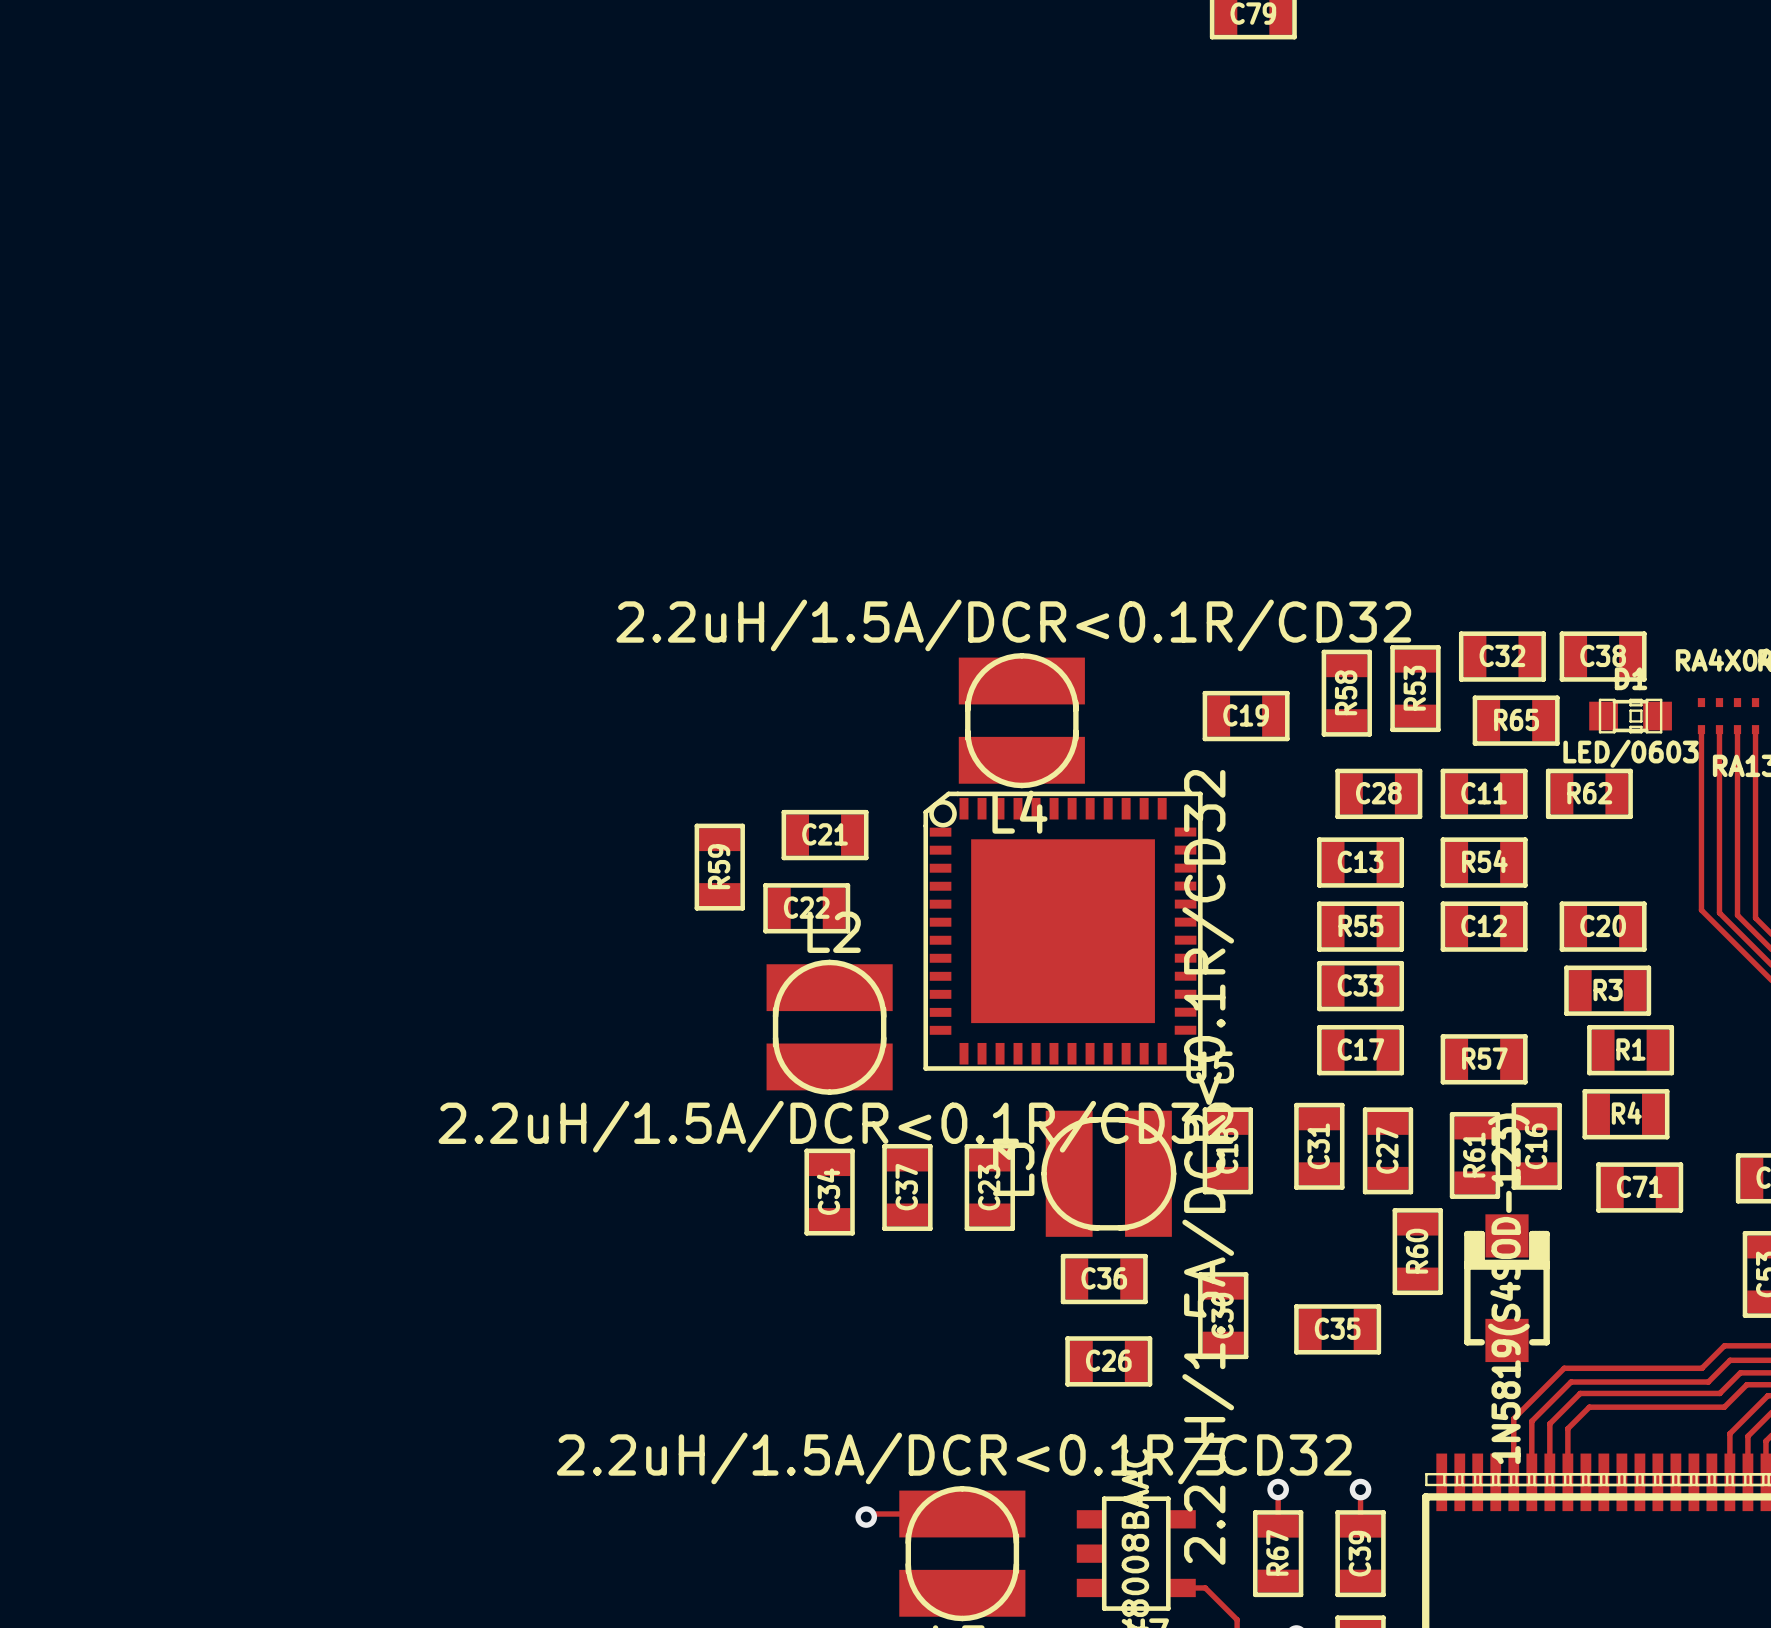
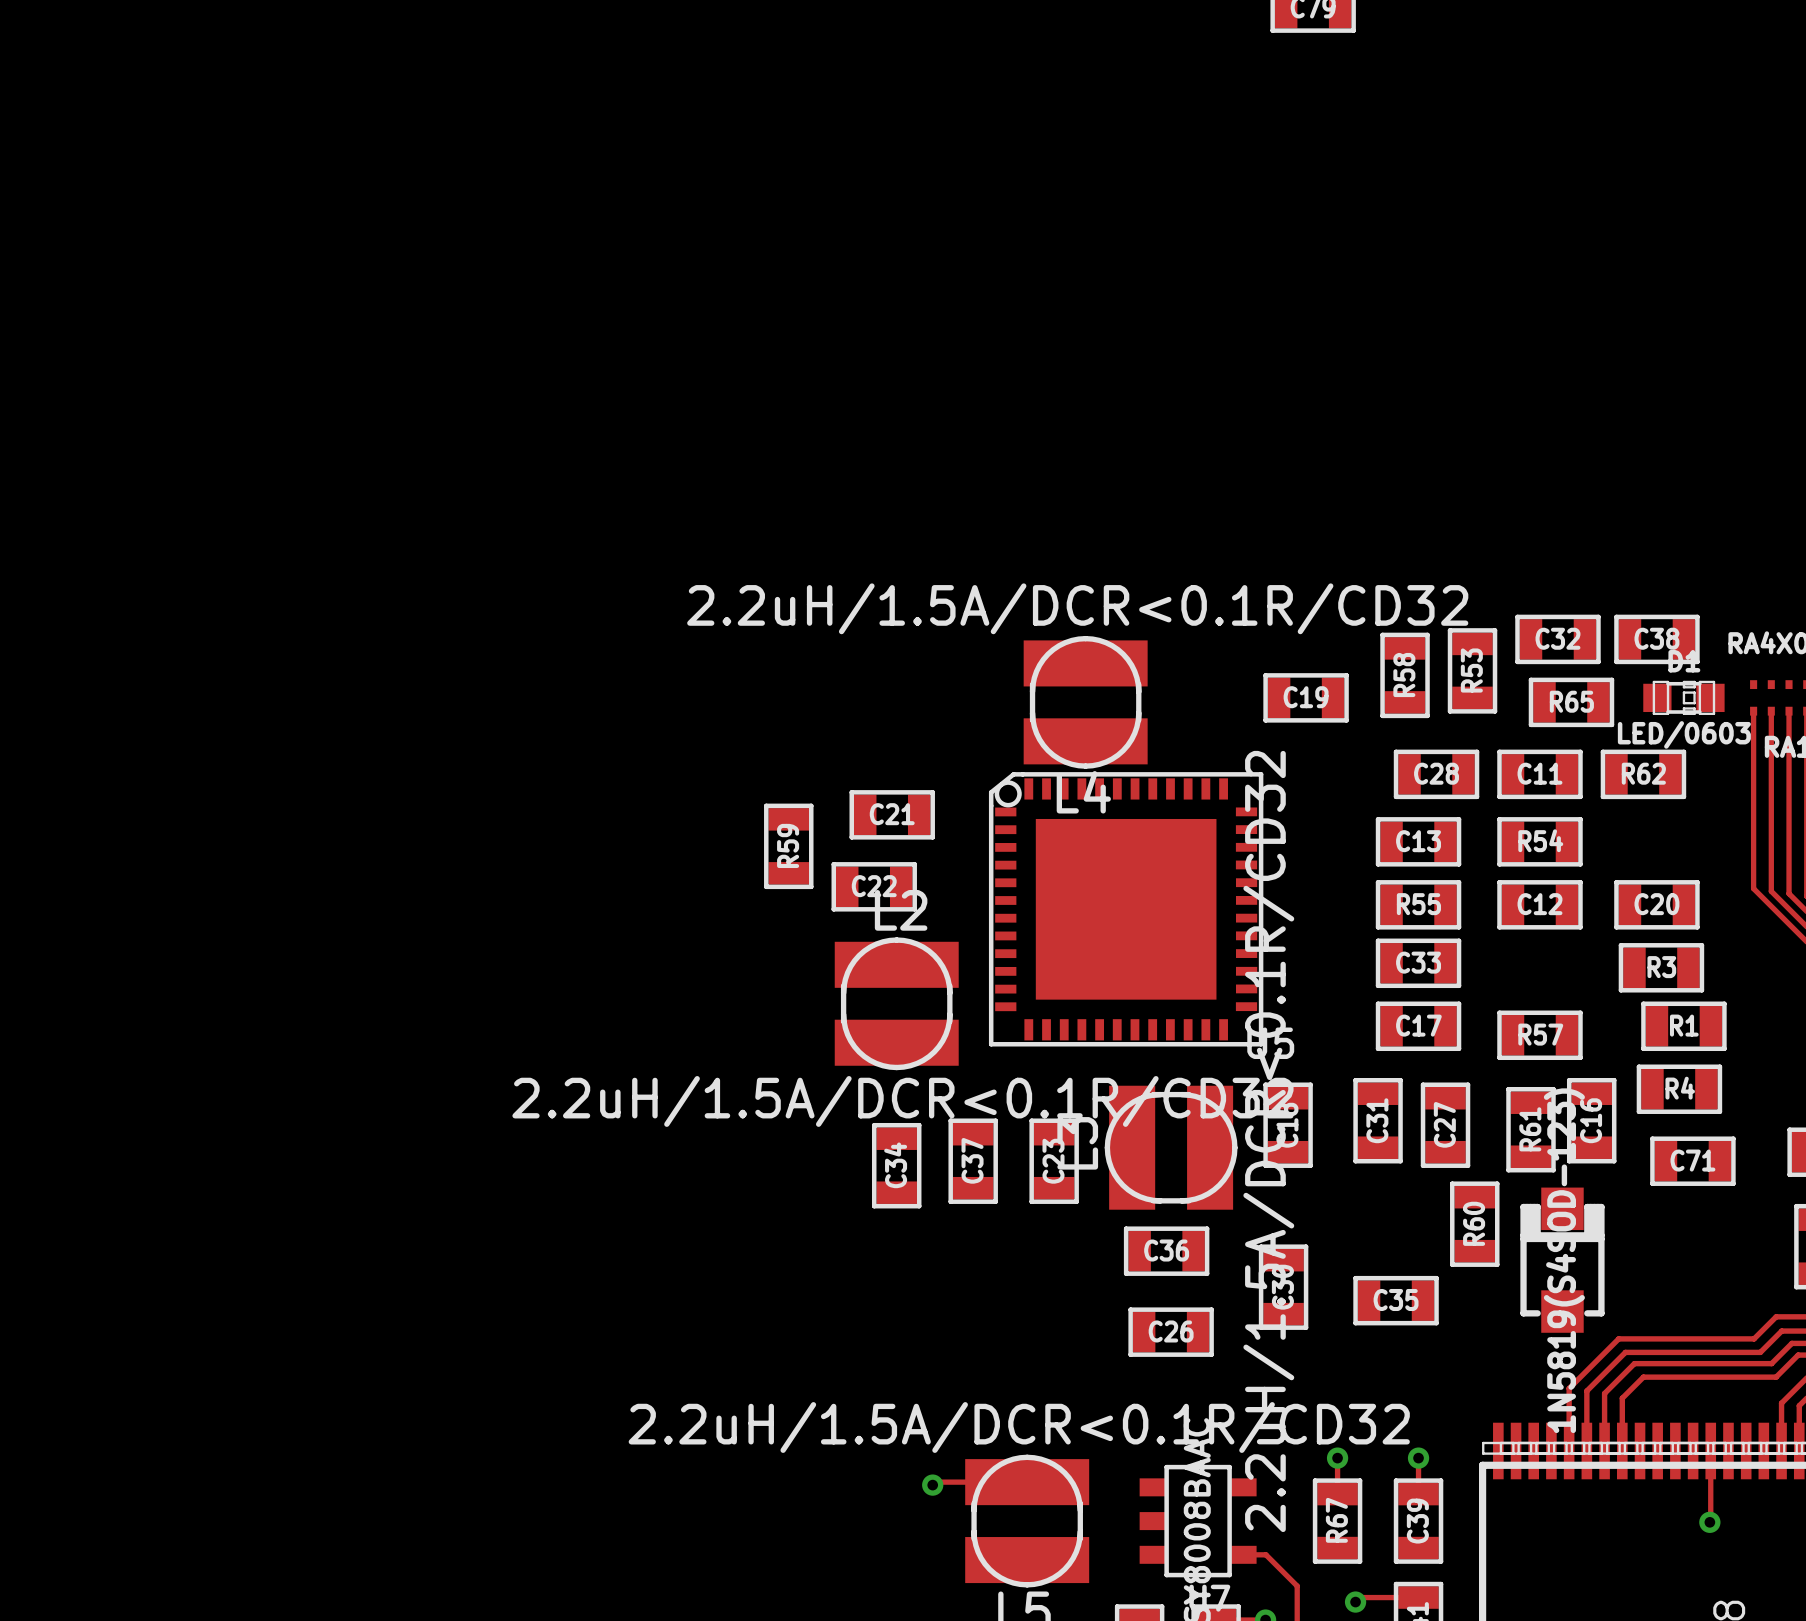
track: none -> (1710, 1451) (1709, 1522)
via: none -> (1709, 1522)

